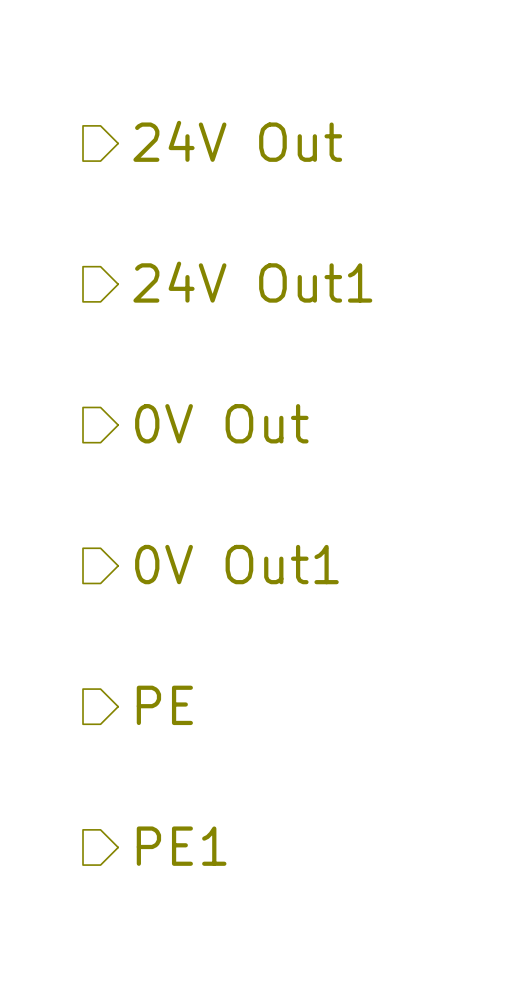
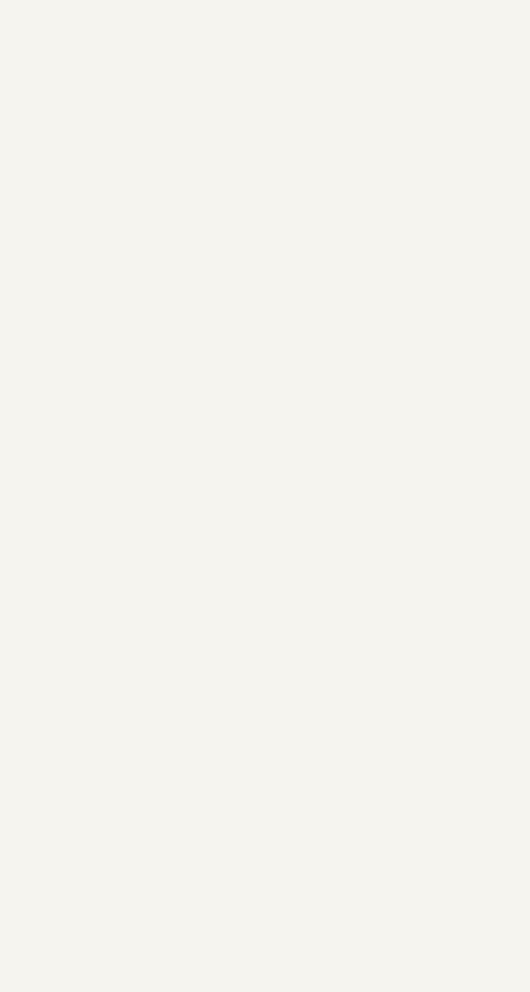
hierarchical label: 24V Out (237, 141) -> none
hierarchical label: 24V Out1 (252, 282) -> none
hierarchical label: 0V Out (221, 423) -> none
hierarchical label: 0V Out1 (236, 564) -> none
hierarchical label: PE (164, 705) -> none
hierarchical label: PE1 (181, 846) -> none

